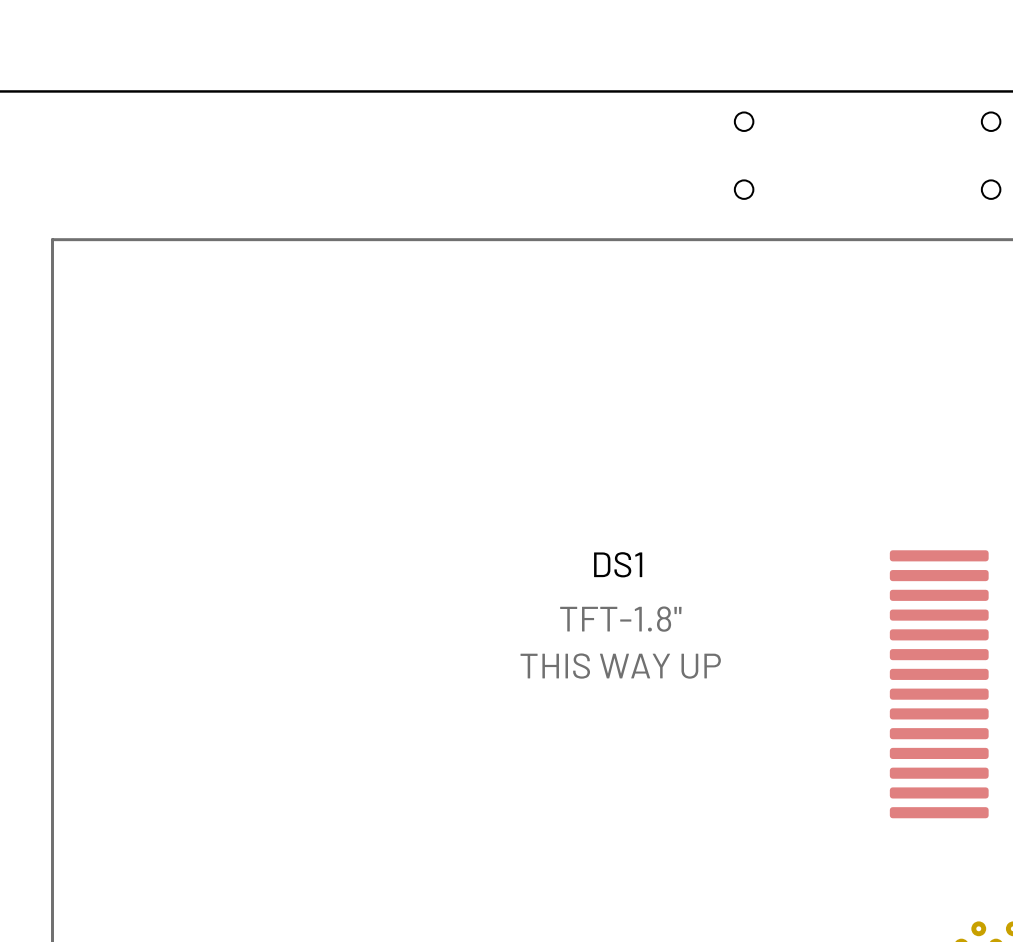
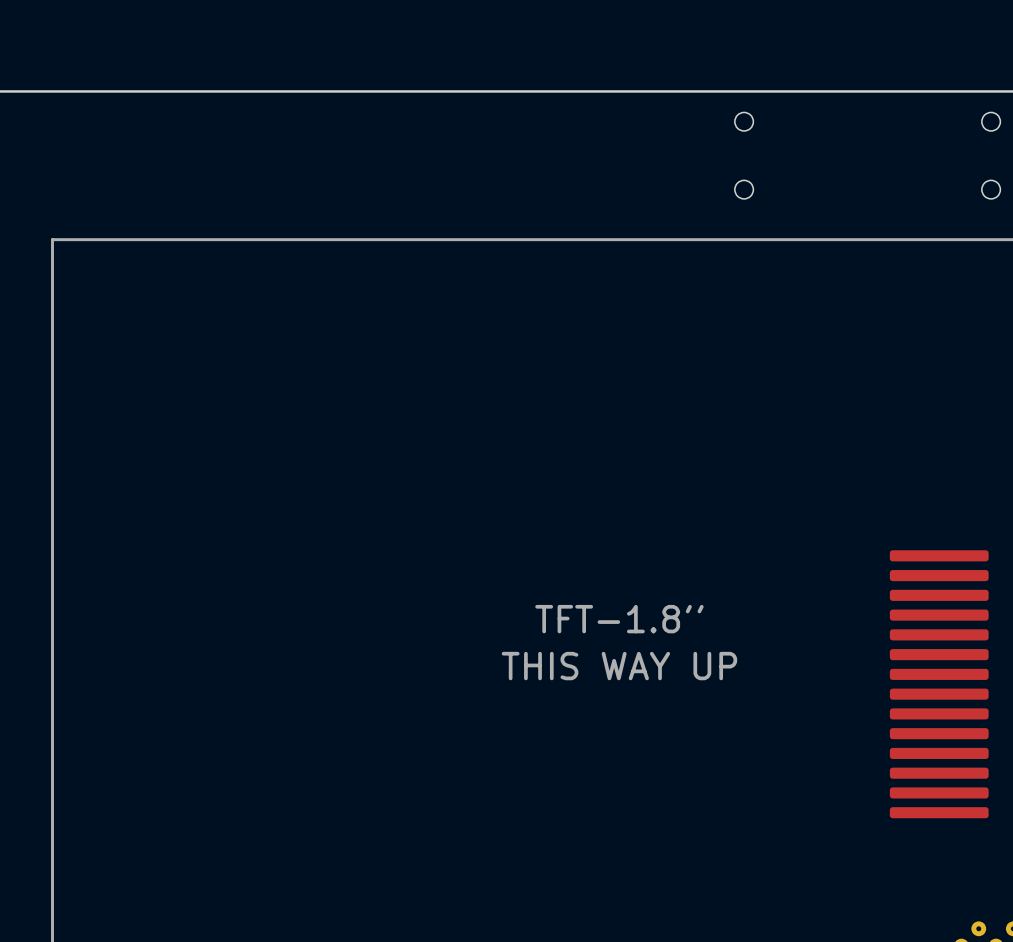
DS1 name: DS1 (618, 564) -> none

